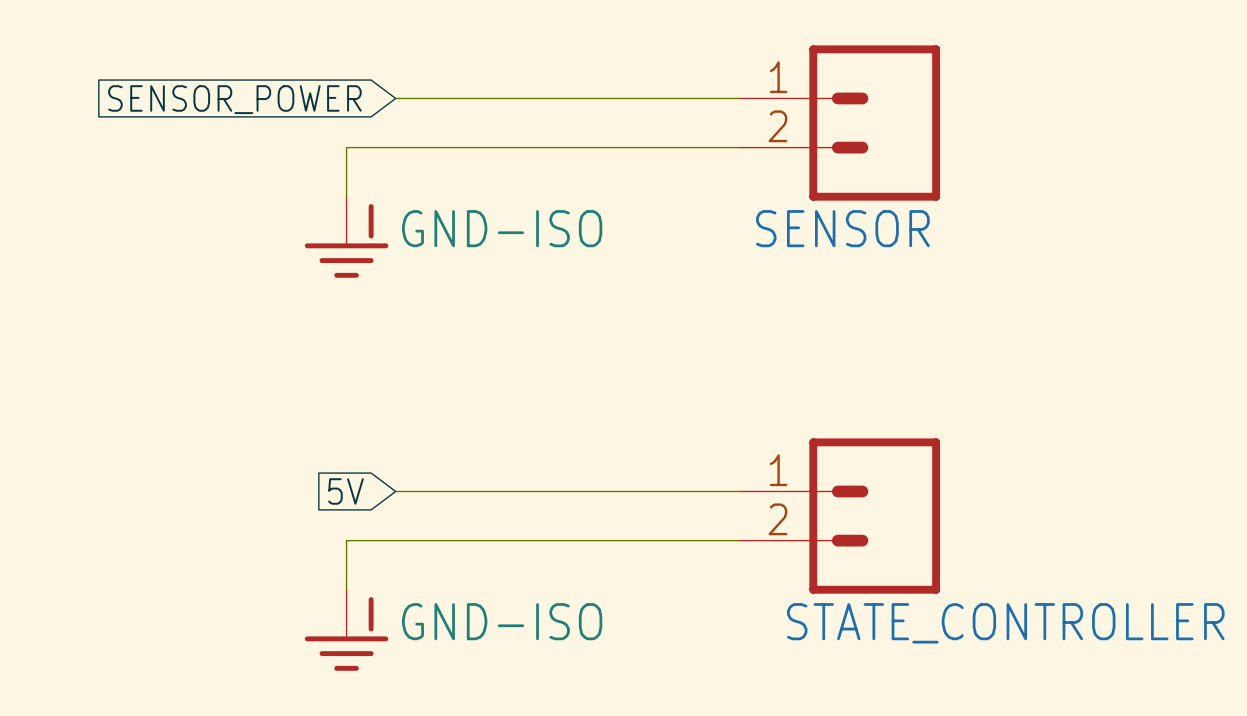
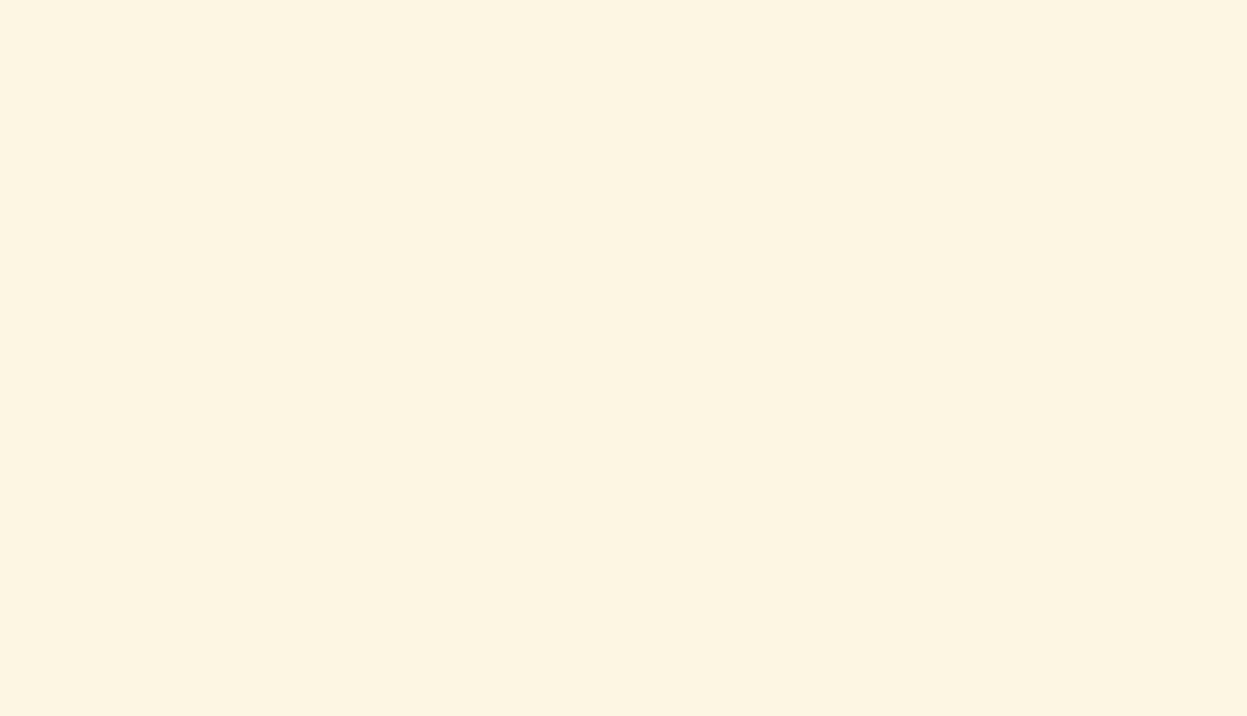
wire: (395, 98) (739, 98) -> none
global label: SENSOR_POWER (234, 99) -> none
SENSOR: (839, 123) -> none
wire: (739, 147) (346, 147) (346, 196) -> none
power symbol: GND-ISO (346, 237) -> none
global label: 5V (345, 491) -> none
wire: (395, 491) (739, 491) -> none
STATE_CONTROLLER: (839, 516) -> none
wire: (739, 540) (346, 540) (346, 589) -> none
power symbol: GND-ISO (346, 630) -> none

